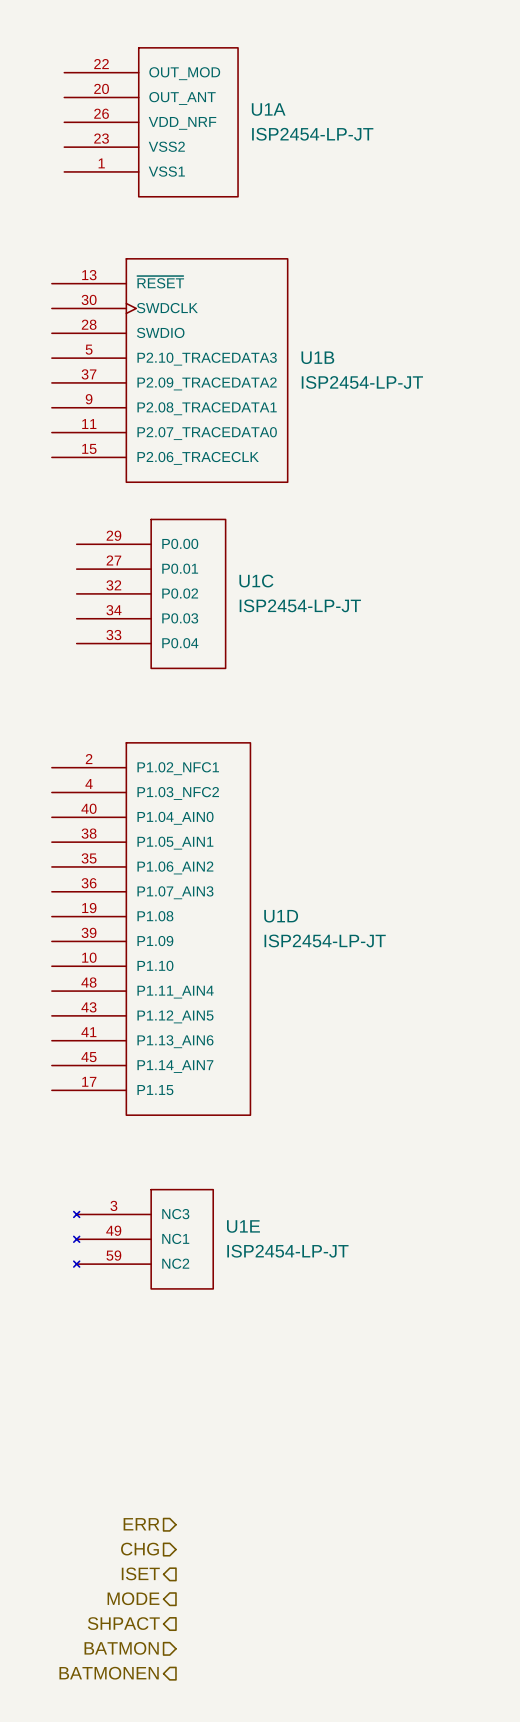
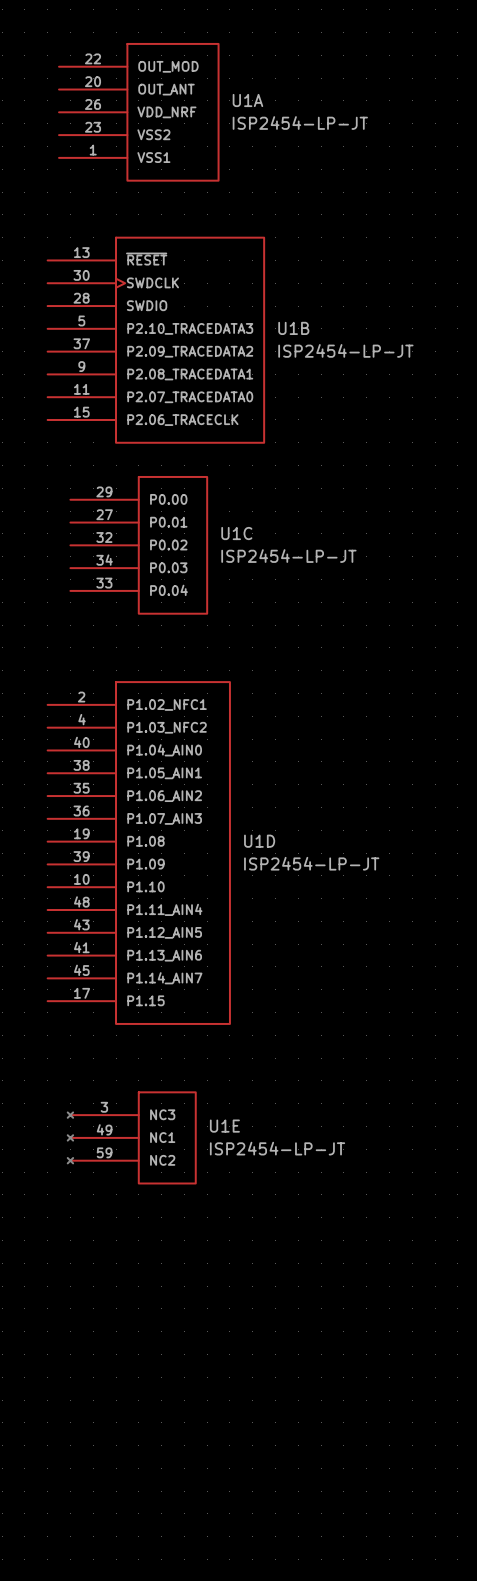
hierarchical label: ERR (141, 1524) -> none
hierarchical label: CHG (139, 1549) -> none
hierarchical label: ISET (140, 1573) -> none
hierarchical label: MODE (133, 1598) -> none
hierarchical label: SHPACT (123, 1623) -> none
hierarchical label: BATMON (121, 1648) -> none
hierarchical label: BATMONEN (109, 1673) -> none

